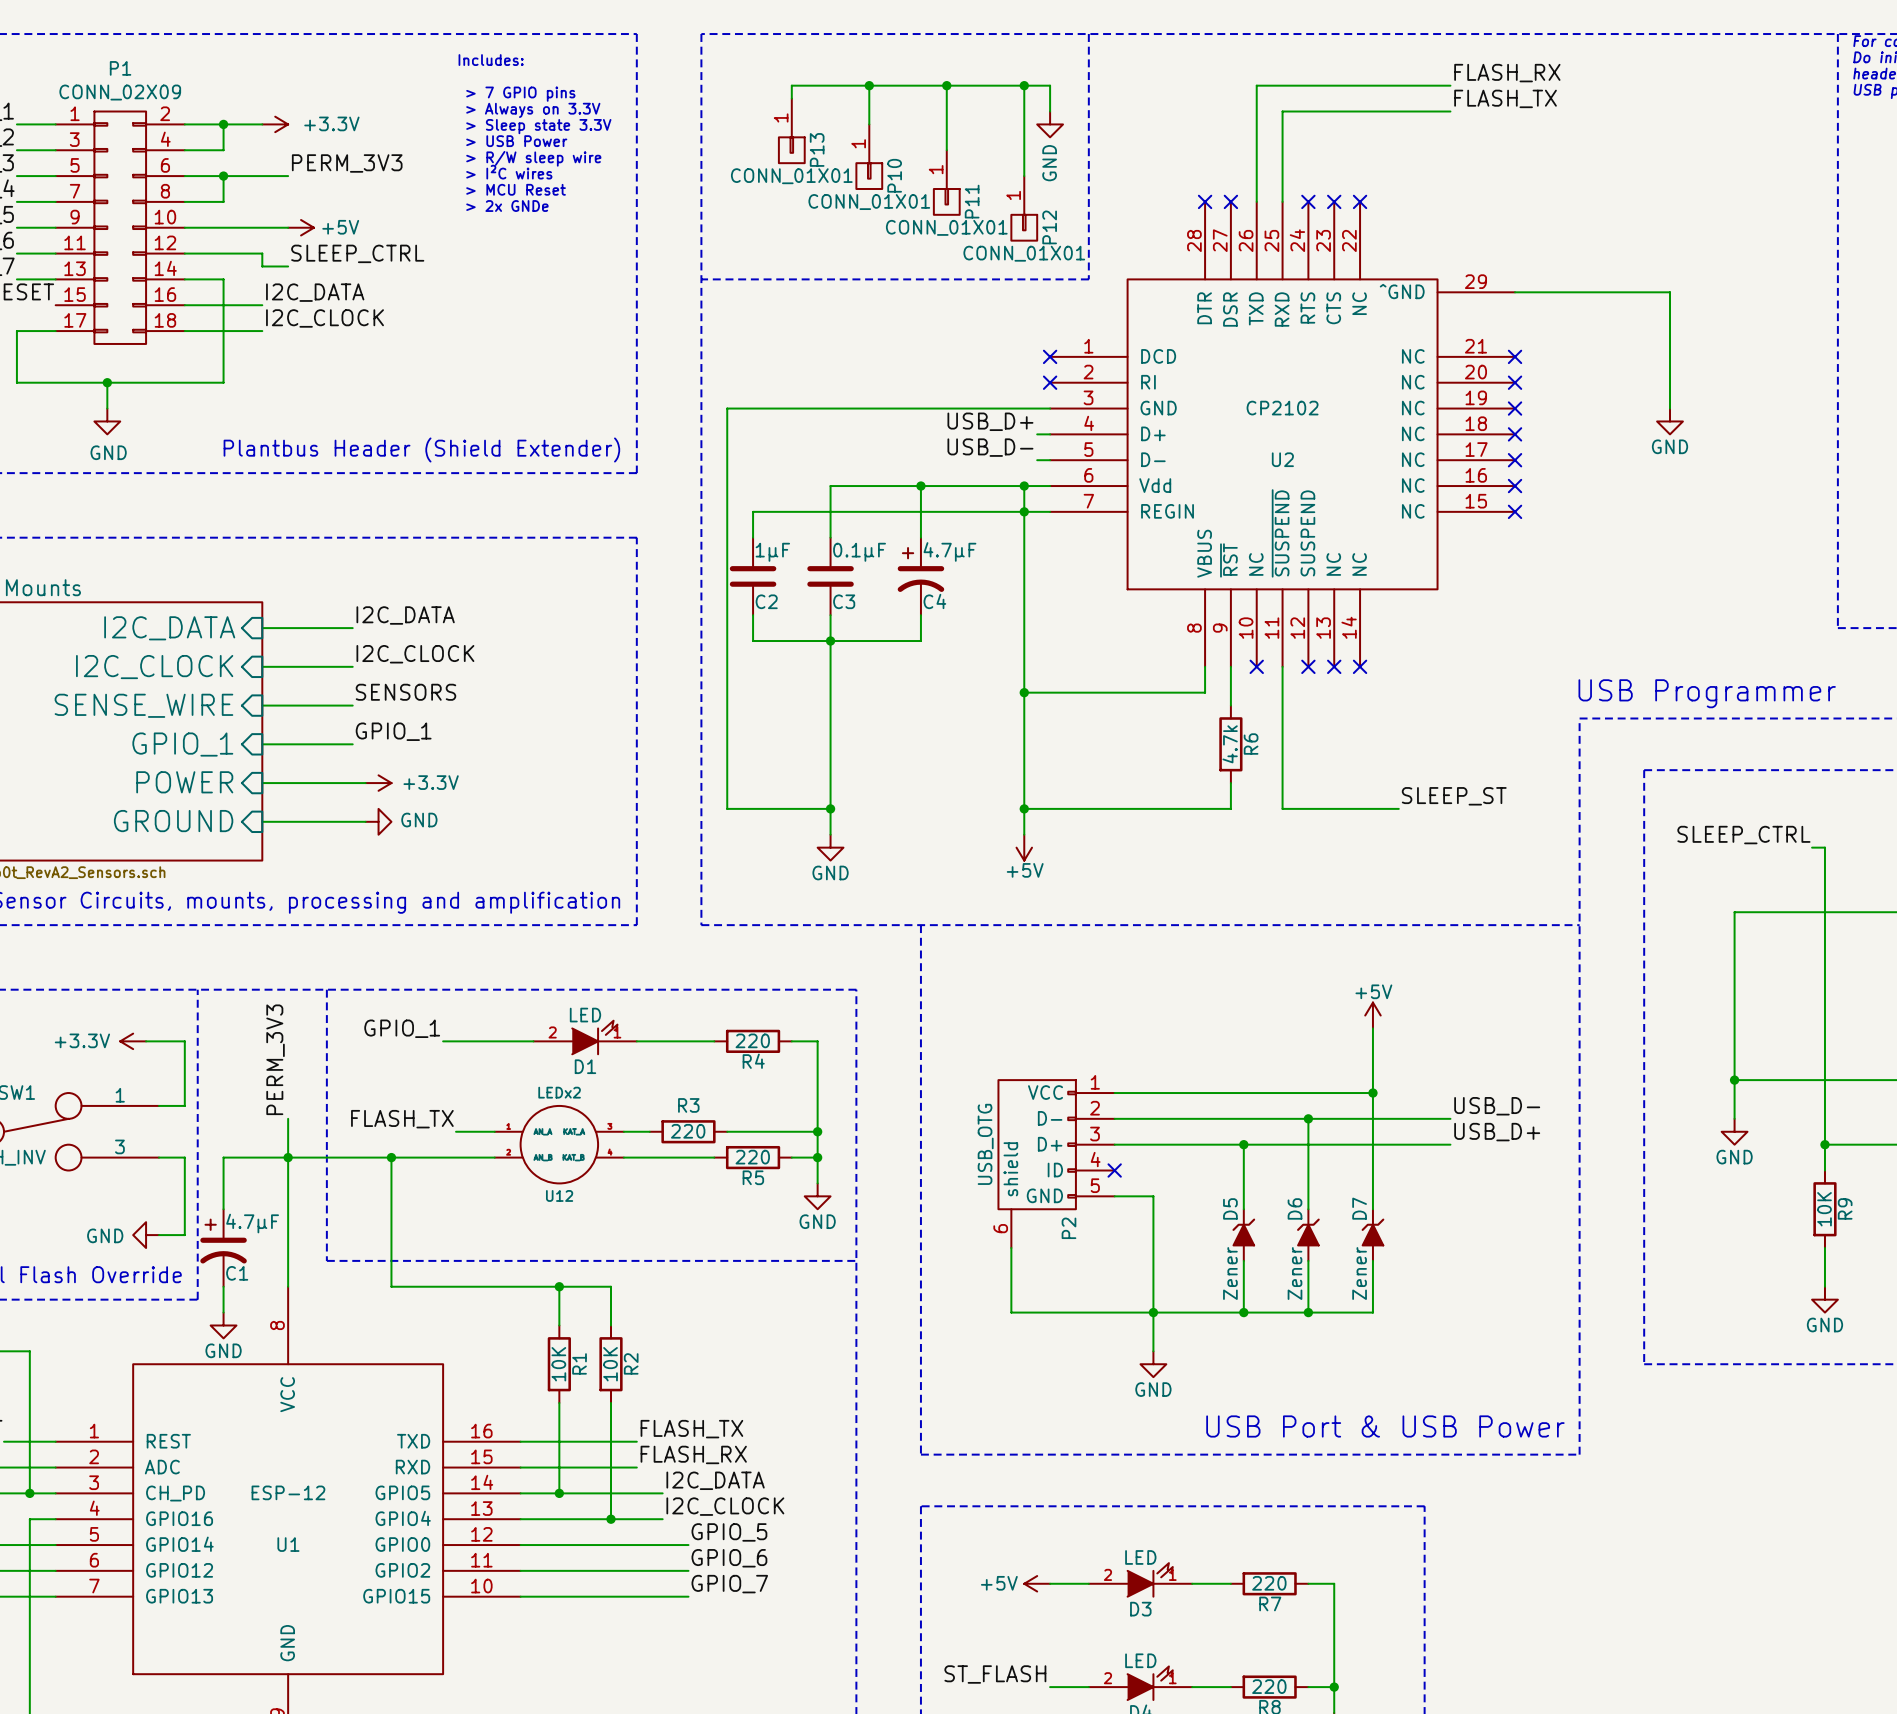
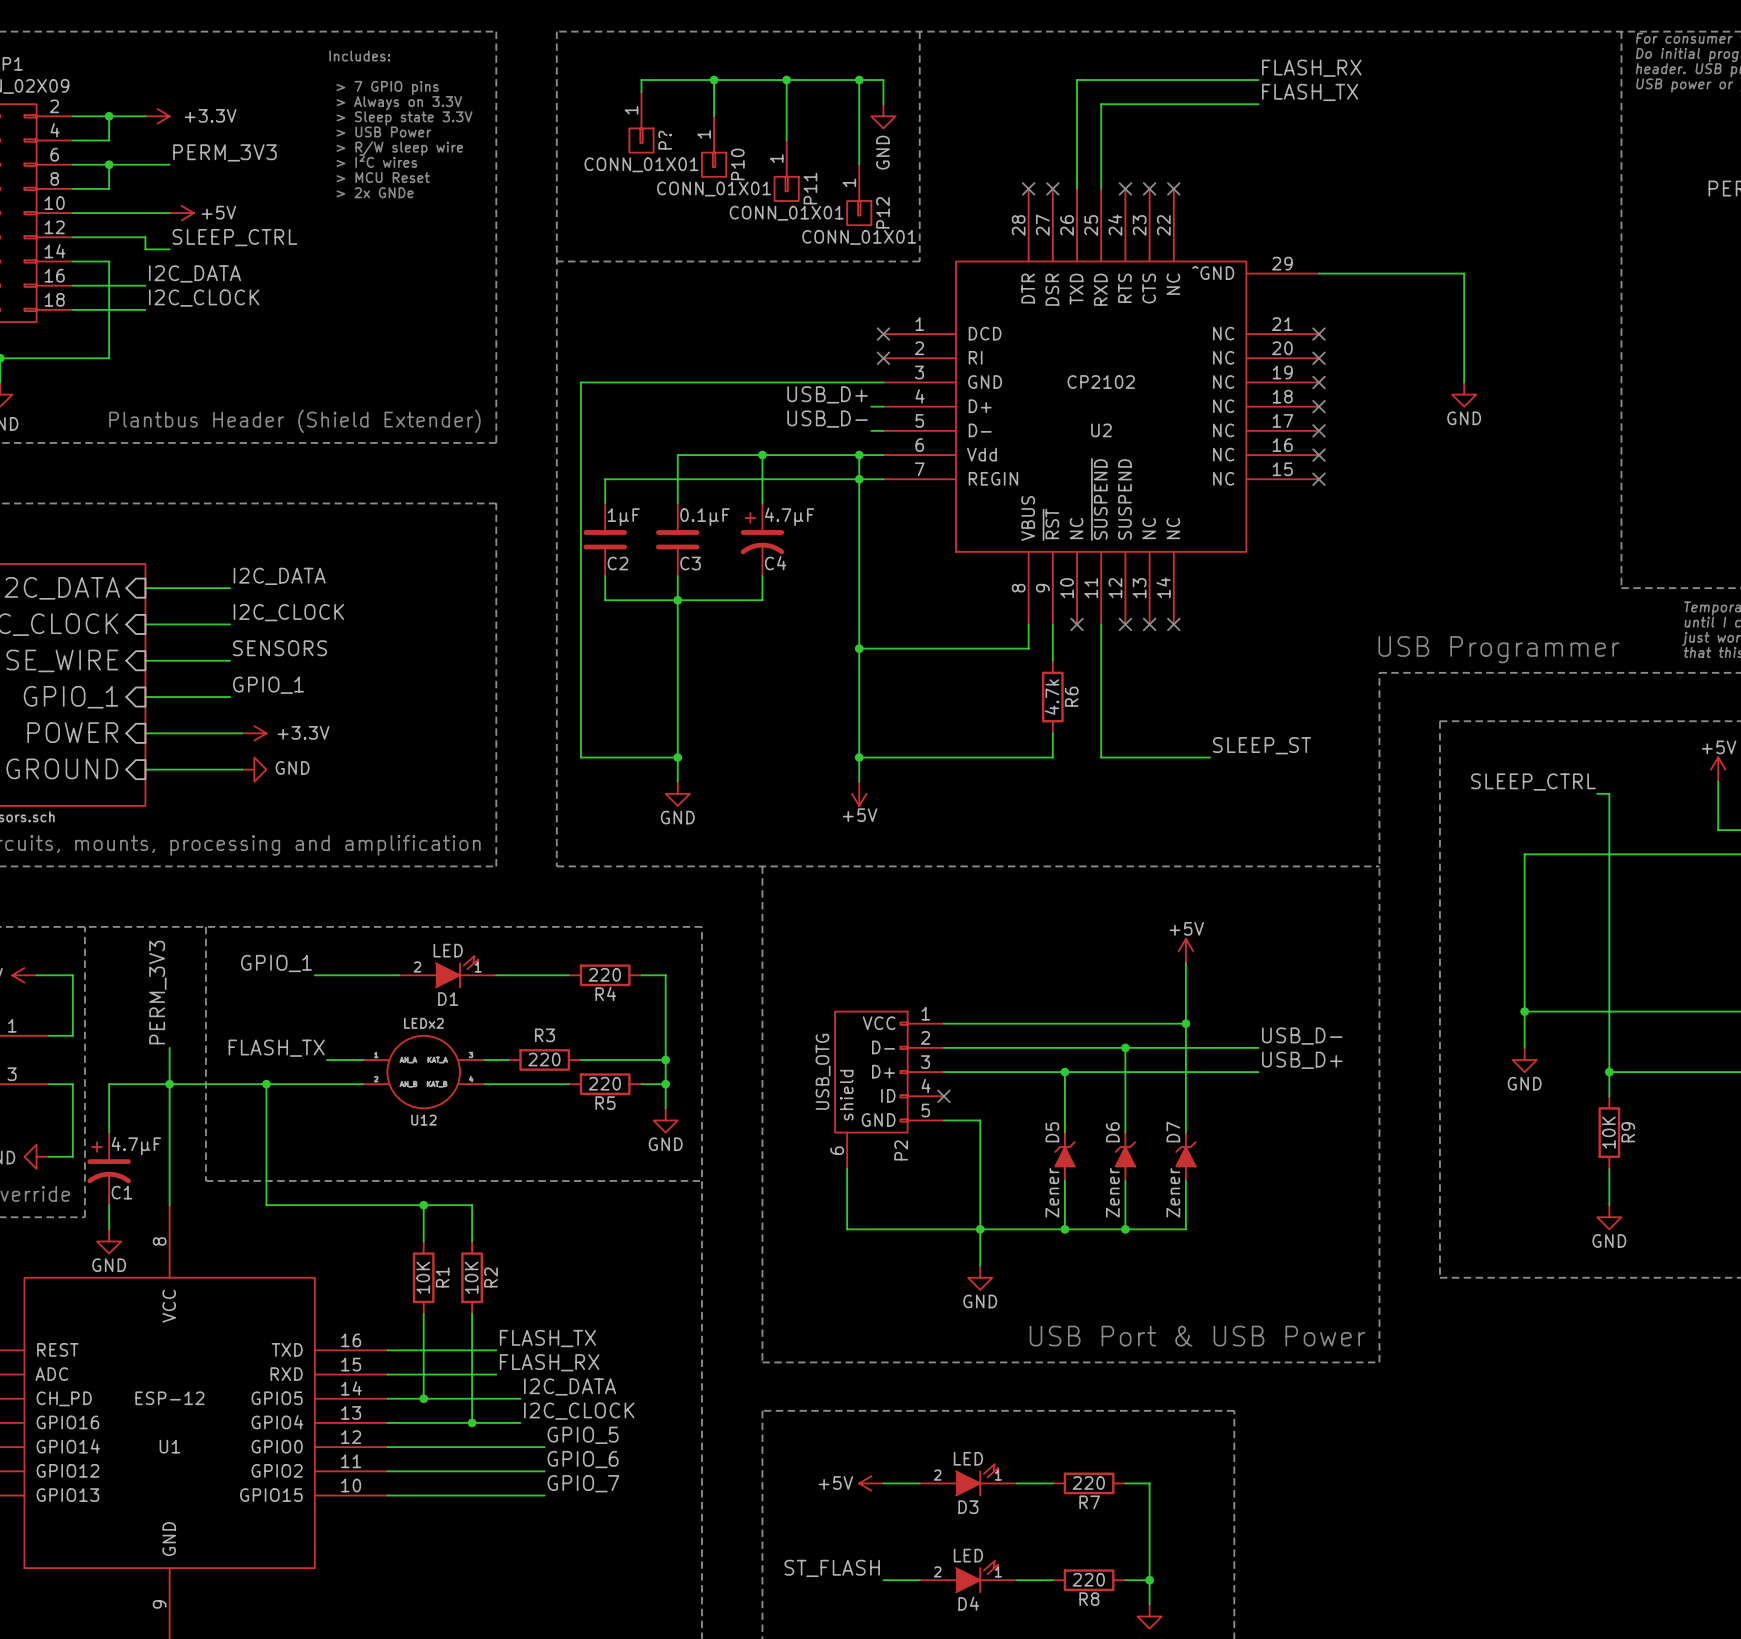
P13 name: P13 (817, 149) -> P? (665, 140)

